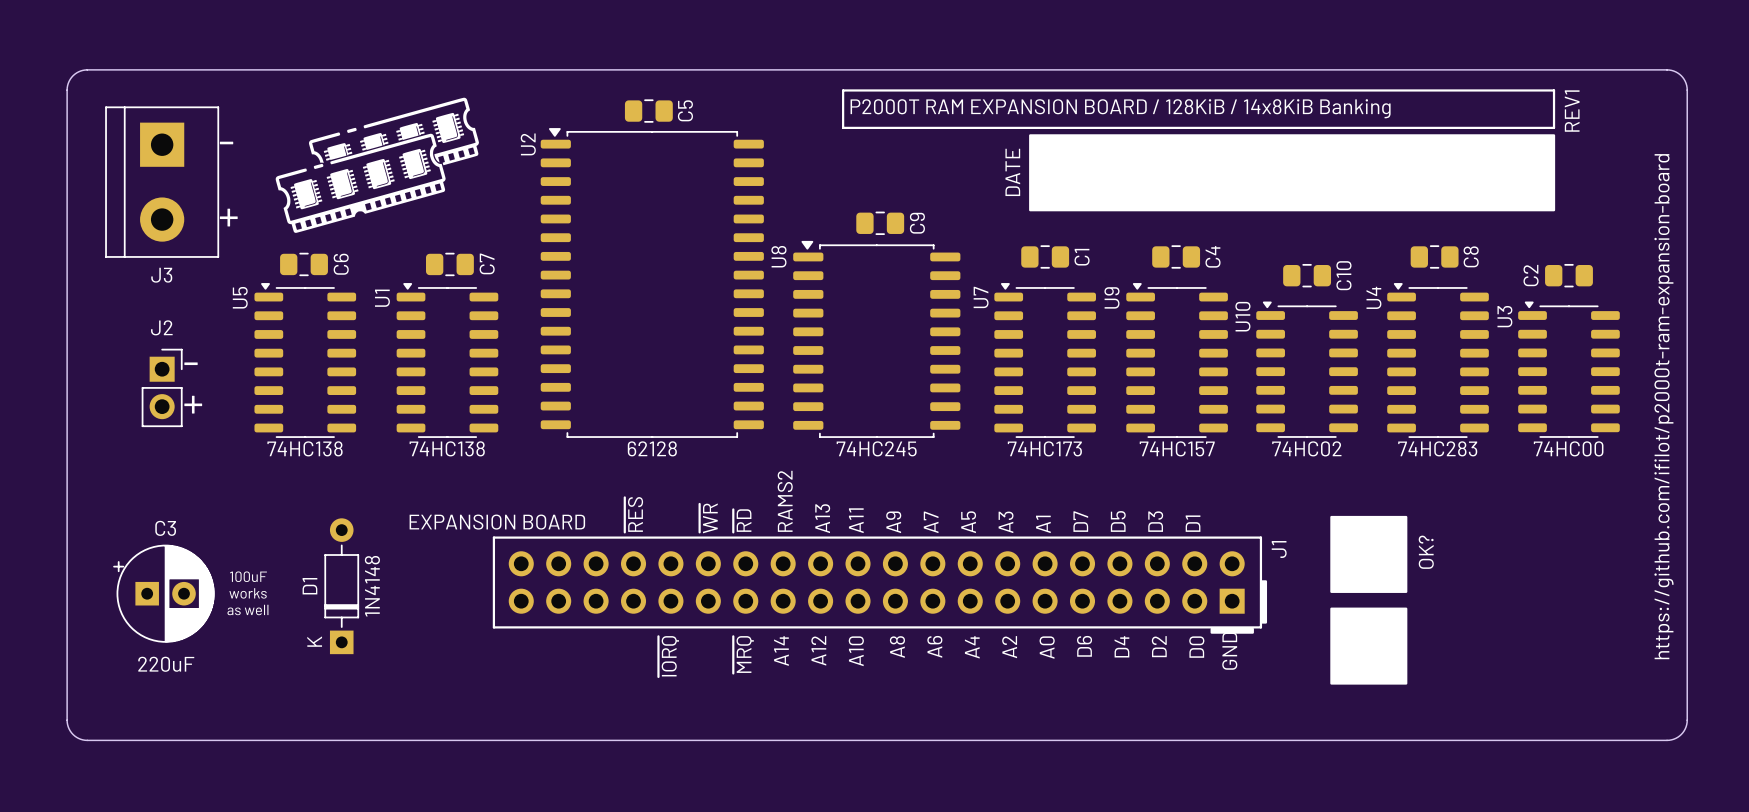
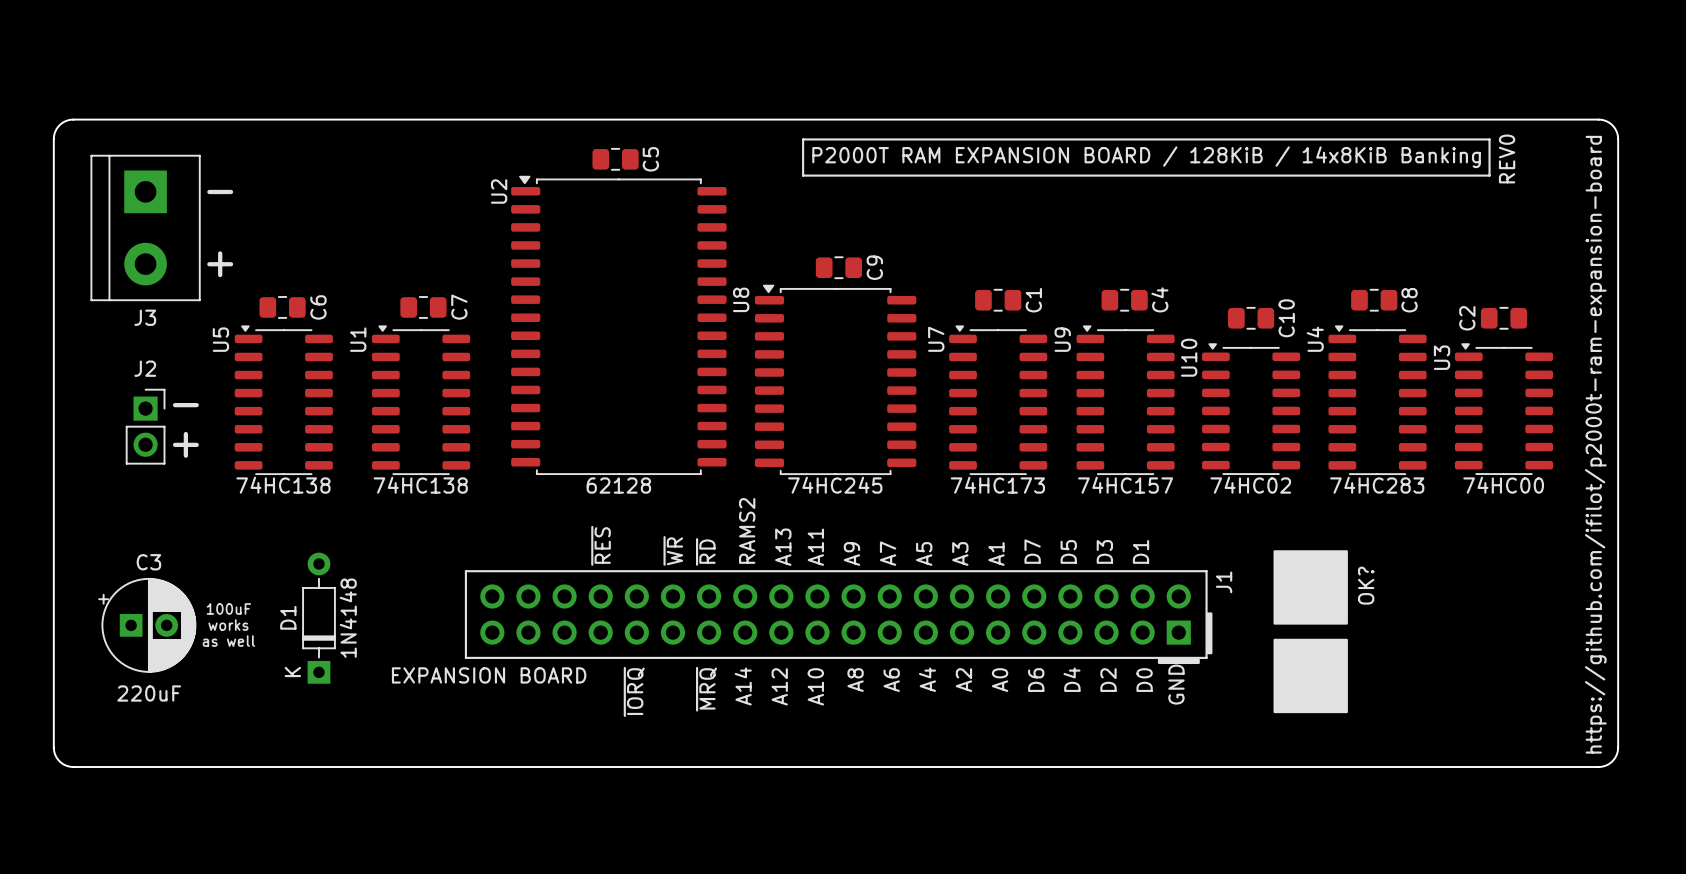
drawing: [275, 97, 479, 233] -> none
text: REV1 (1572, 111) -> REV0 (1507, 158)
drawing: [1029, 134, 1556, 212] -> none
text: DATE (1012, 172) -> none
J1 value position: EXPANSION BOARD (497, 522) -> EXPANSION BOARD (489, 675)

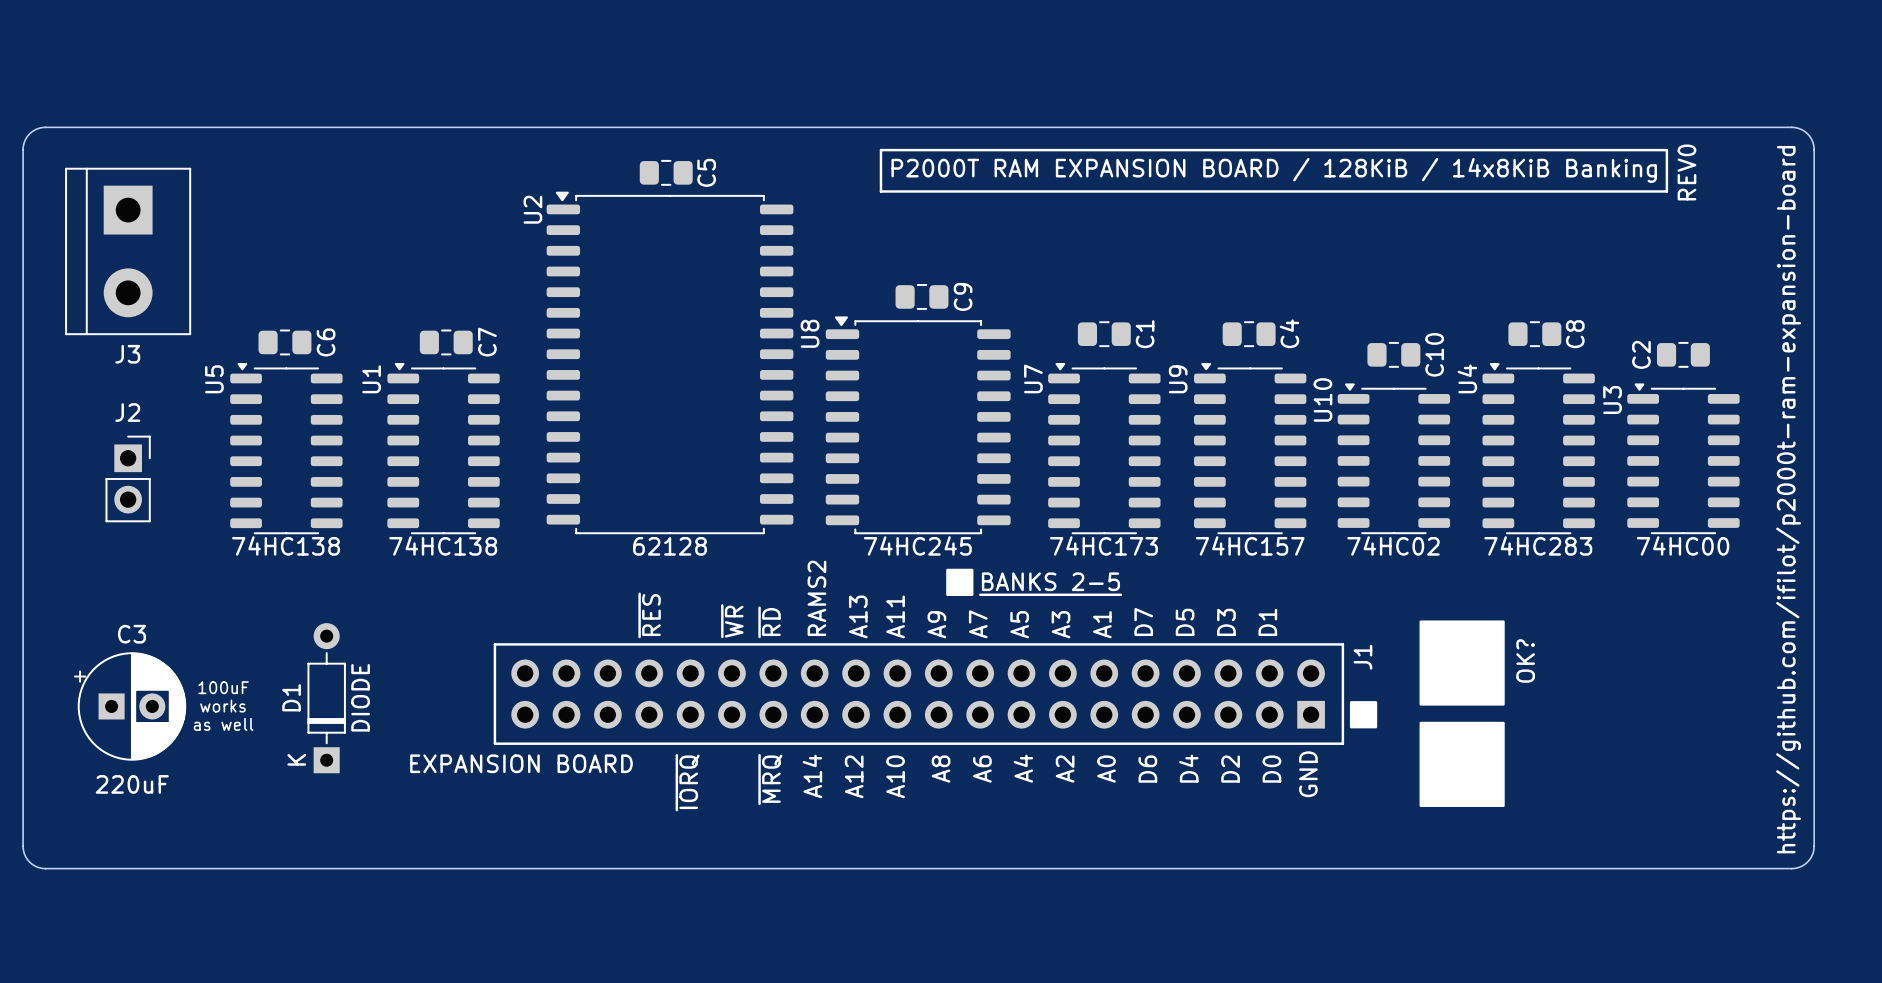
text: - (220, 191) -> none
text: + (220, 264) -> none
text: - (185, 405) -> none
text: + (185, 444) -> none
drawing: none -> [946, 568, 974, 597]
text: none -> BANKS 2-5 (1050, 581)
line: none -> (980, 594) (1120, 594)
drawing: [1157, 612, 1213, 665] -> none
D1 value: 1N4148 (348, 618) -> DIODE (360, 697)
drawing: none -> [1349, 701, 1378, 729]

